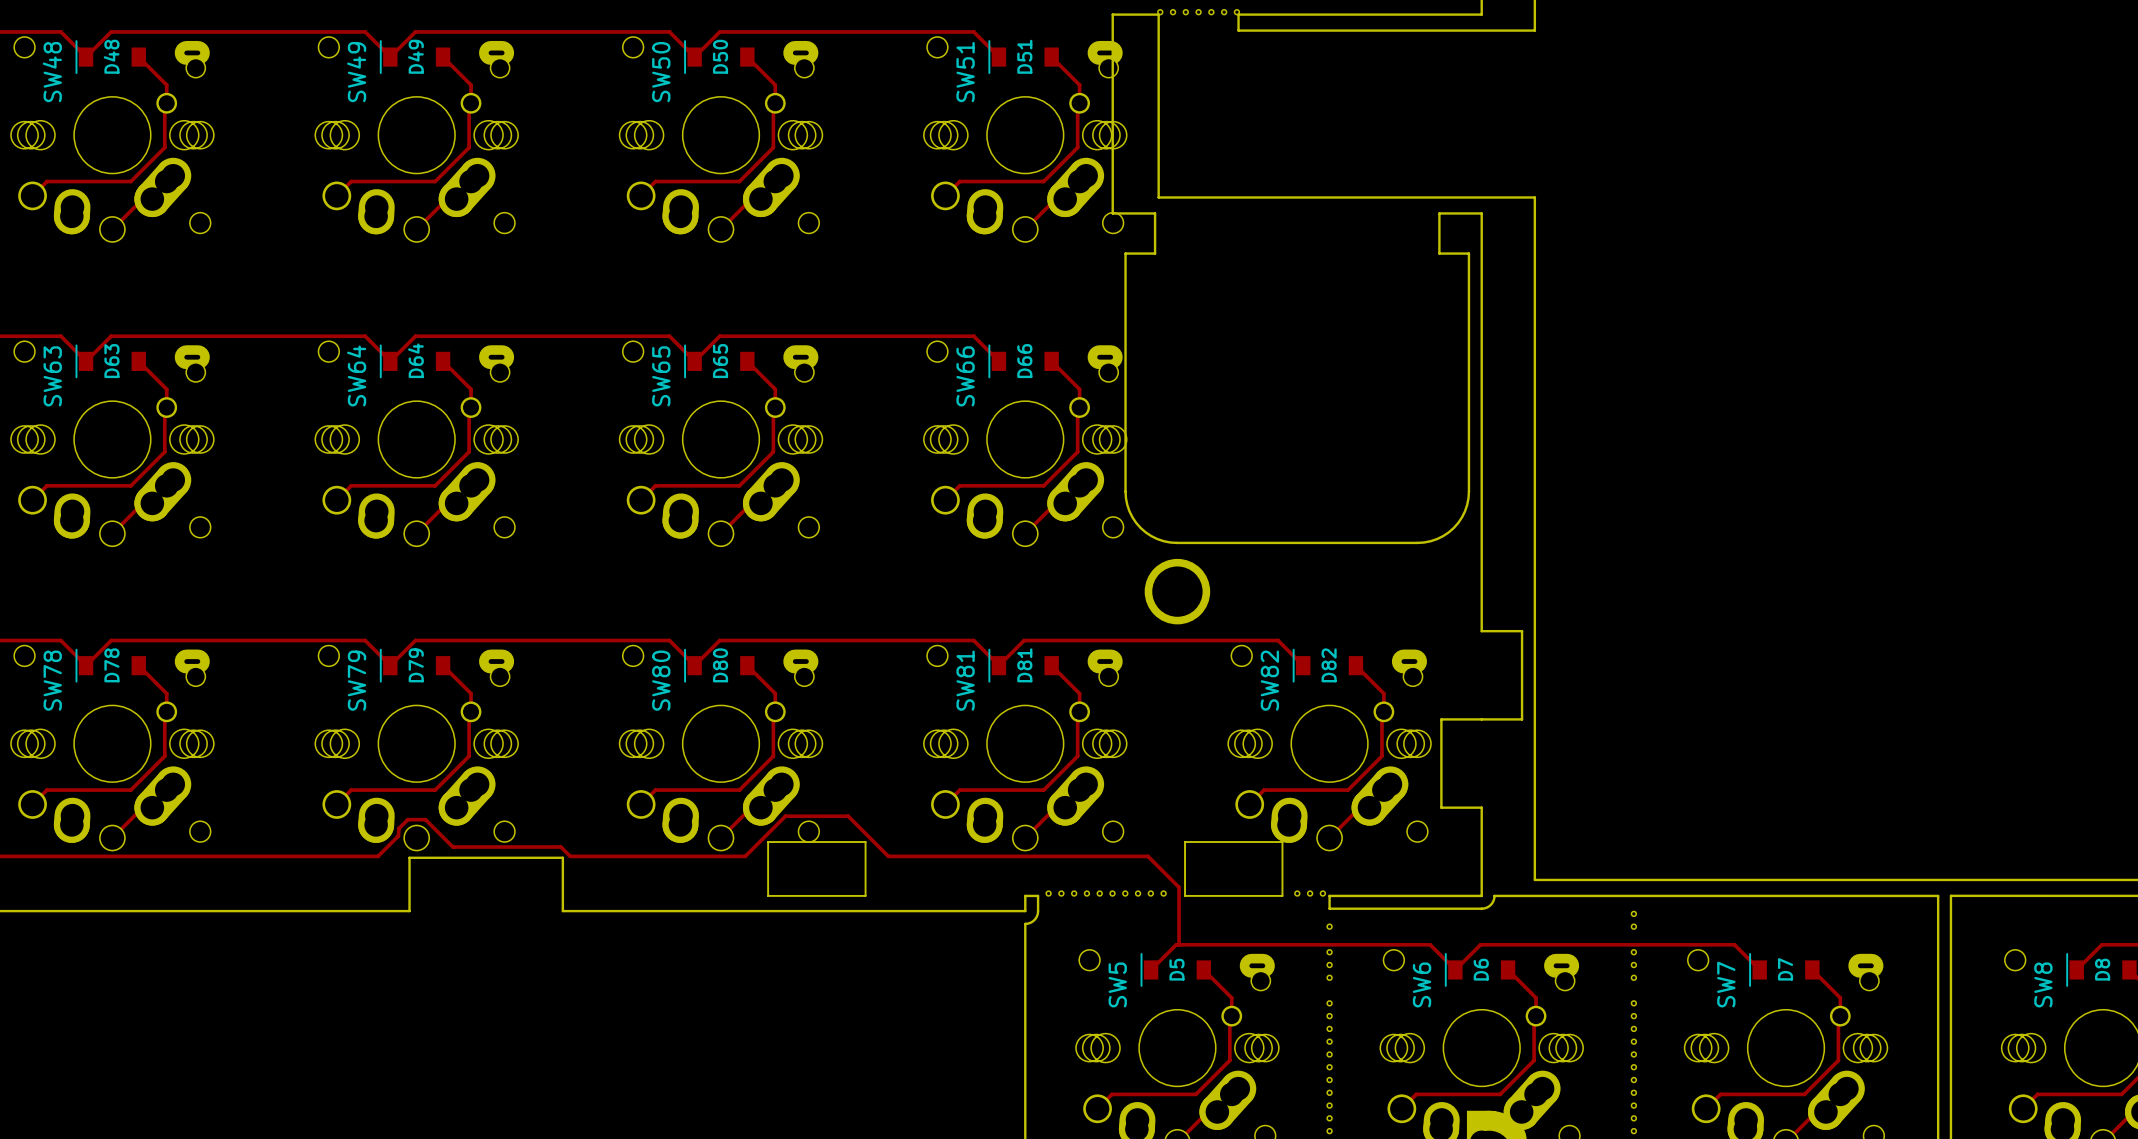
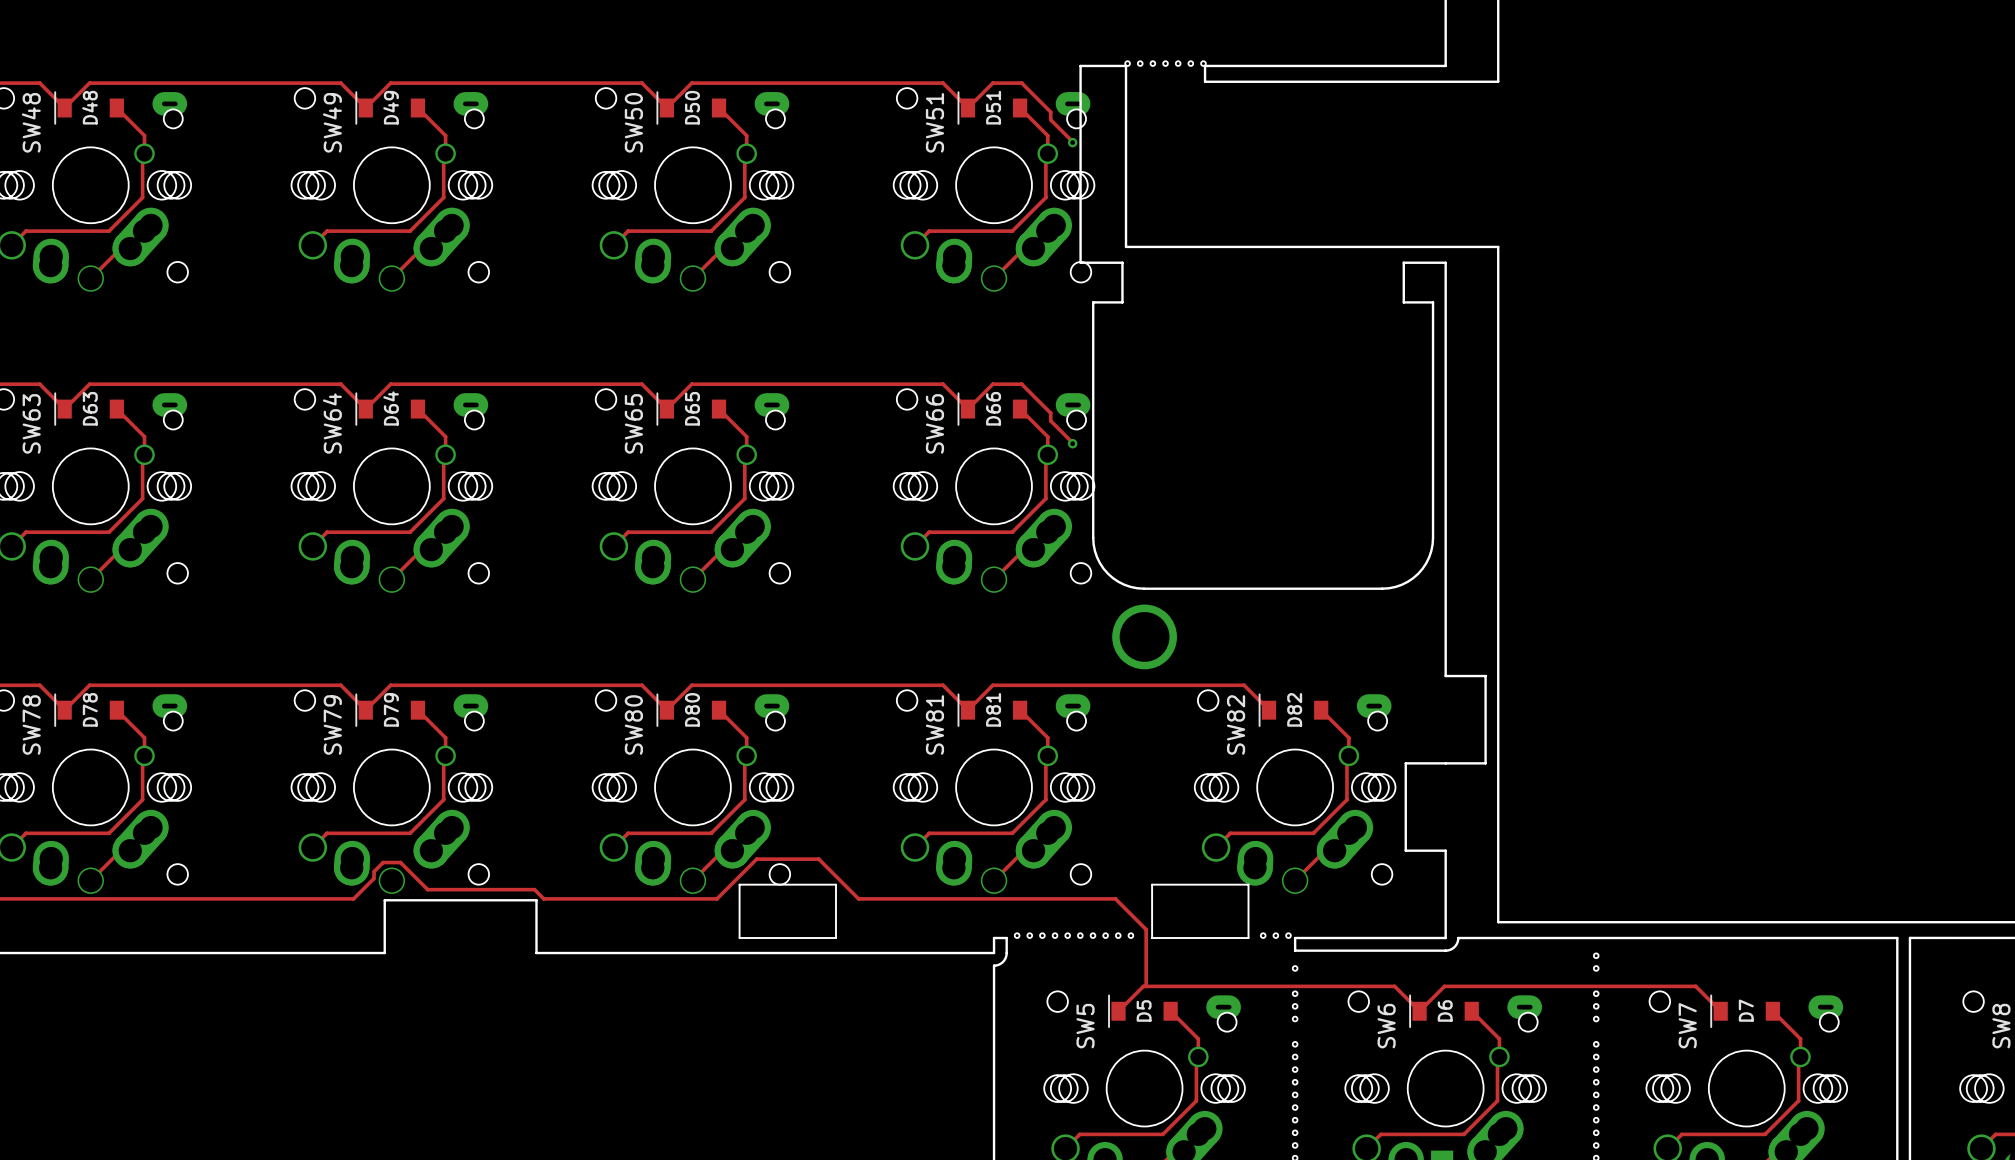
track: none -> (967, 108) (992, 83) (1021, 83) (1050, 112) (1050, 119) (1072, 142)
via: none -> (1072, 142)
track: none -> (967, 409) (992, 384) (1021, 384) (1050, 413) (1050, 420) (1072, 442)
via: none -> (1072, 443)

